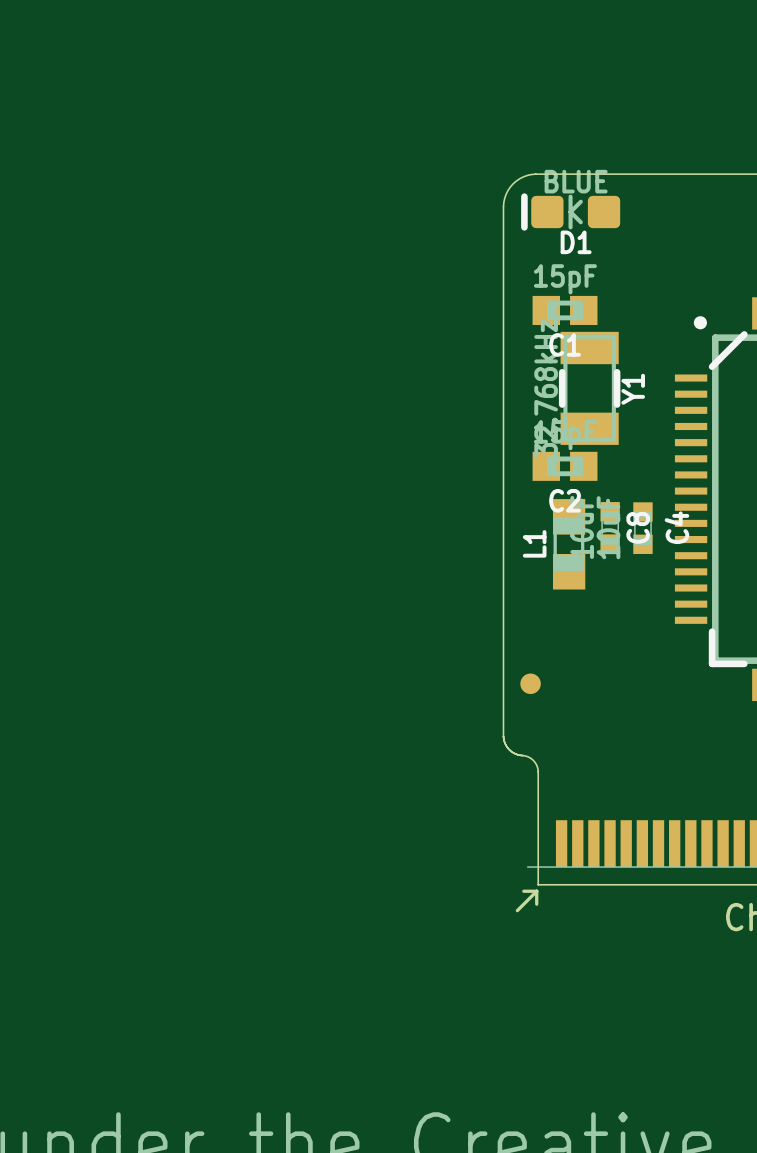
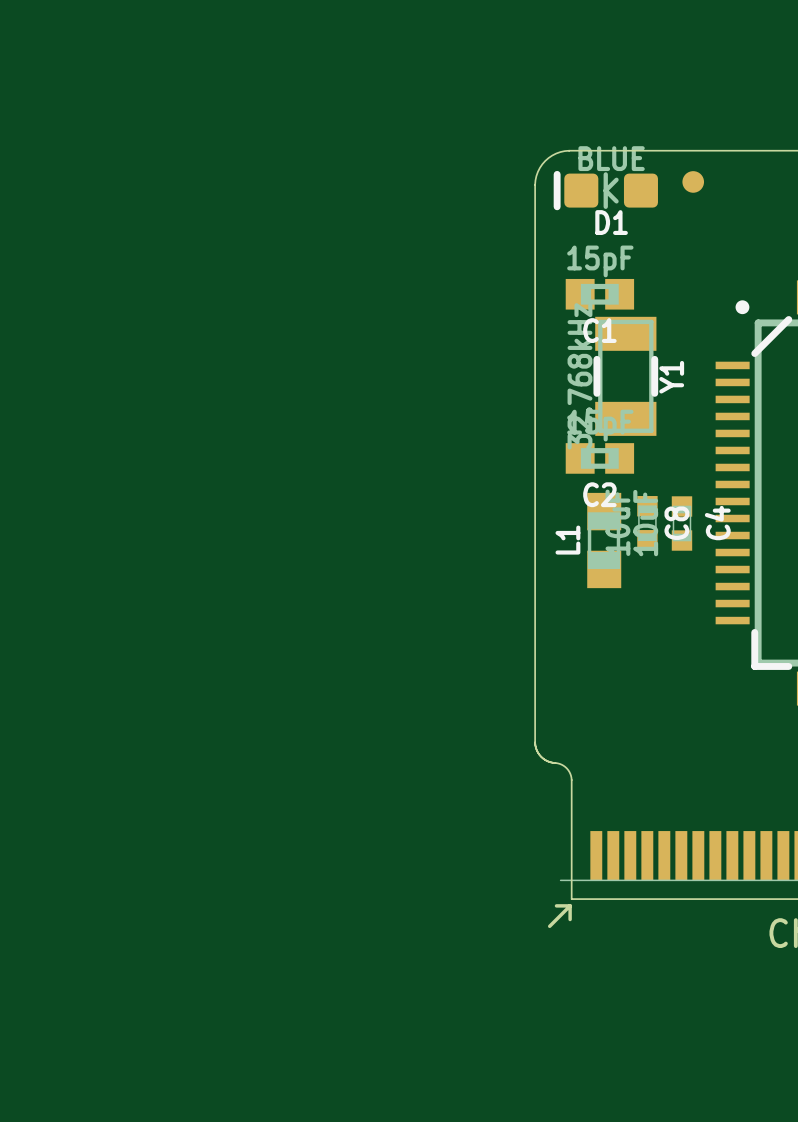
part position: (530, 683) -> (693, 181)

